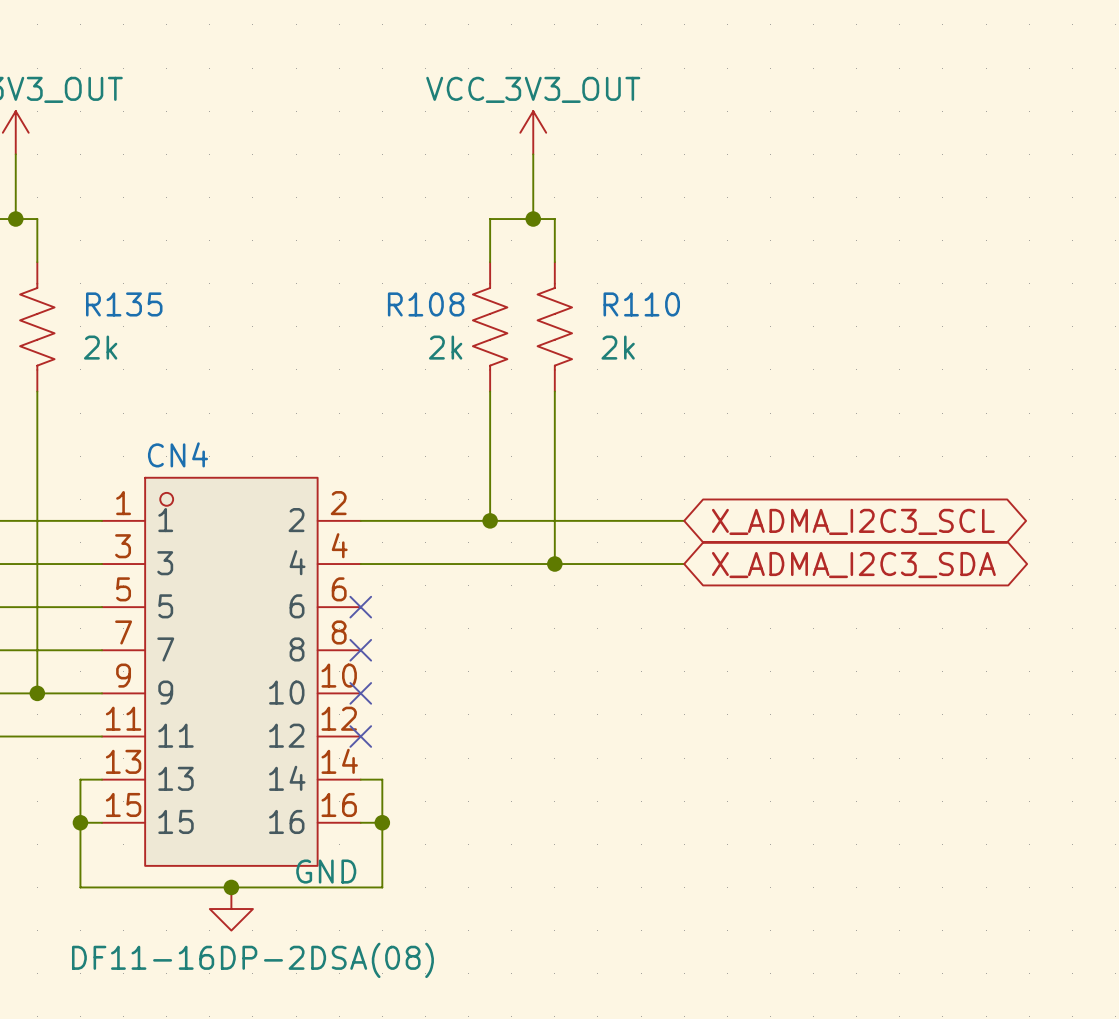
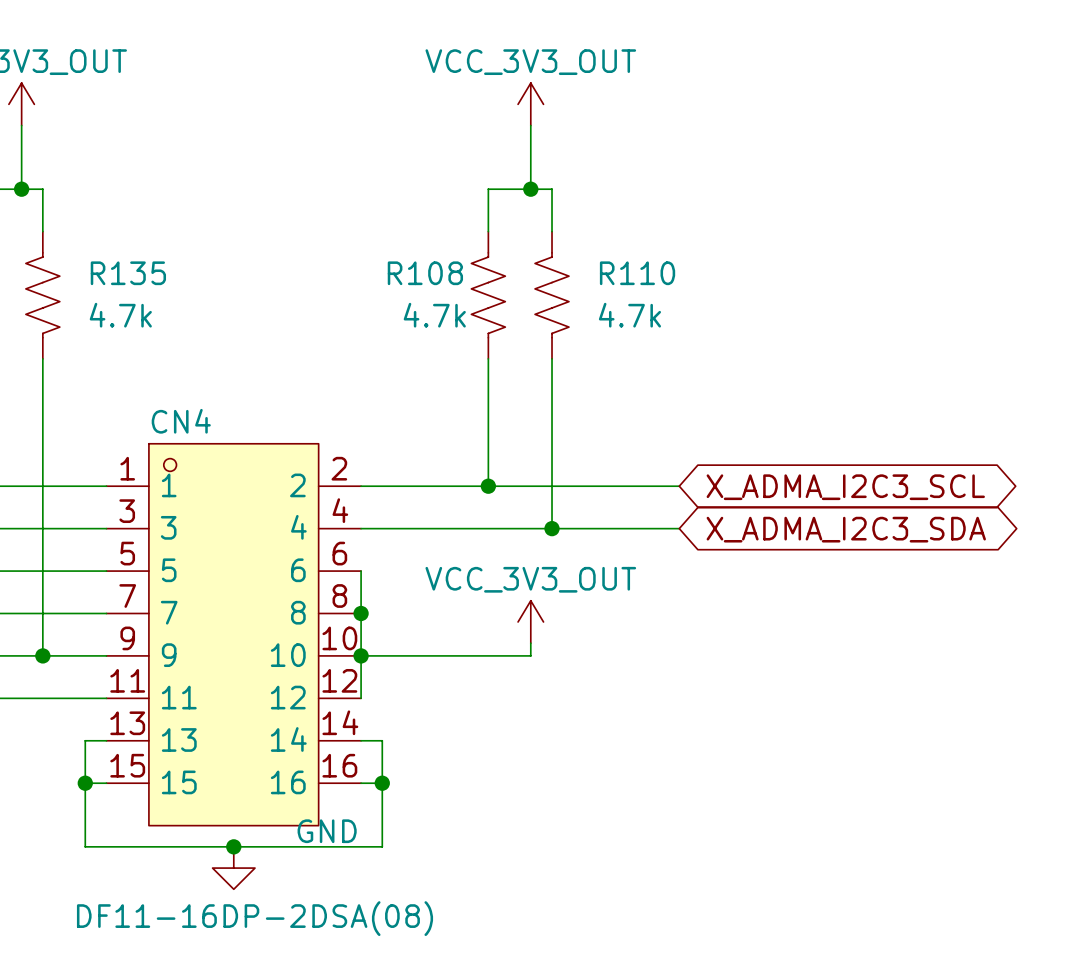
R135 value: 2k (100, 347) -> 4.7k (120, 315)
R108 value: 2k (445, 347) -> 4.7k (434, 315)
R110 value: 2k (618, 347) -> 4.7k (629, 315)
wire: none -> (361, 571) (361, 698)
no-connect mark: (360, 607) -> none
no-connect mark: (360, 650) -> none
junction: none -> (361, 613)
power symbol: none -> VCC_3V3_OUT (530, 621)
wire: none -> (530, 643) (530, 655) (361, 655)
no-connect mark: (360, 693) -> none
junction: none -> (361, 655)
no-connect mark: (360, 736) -> none

